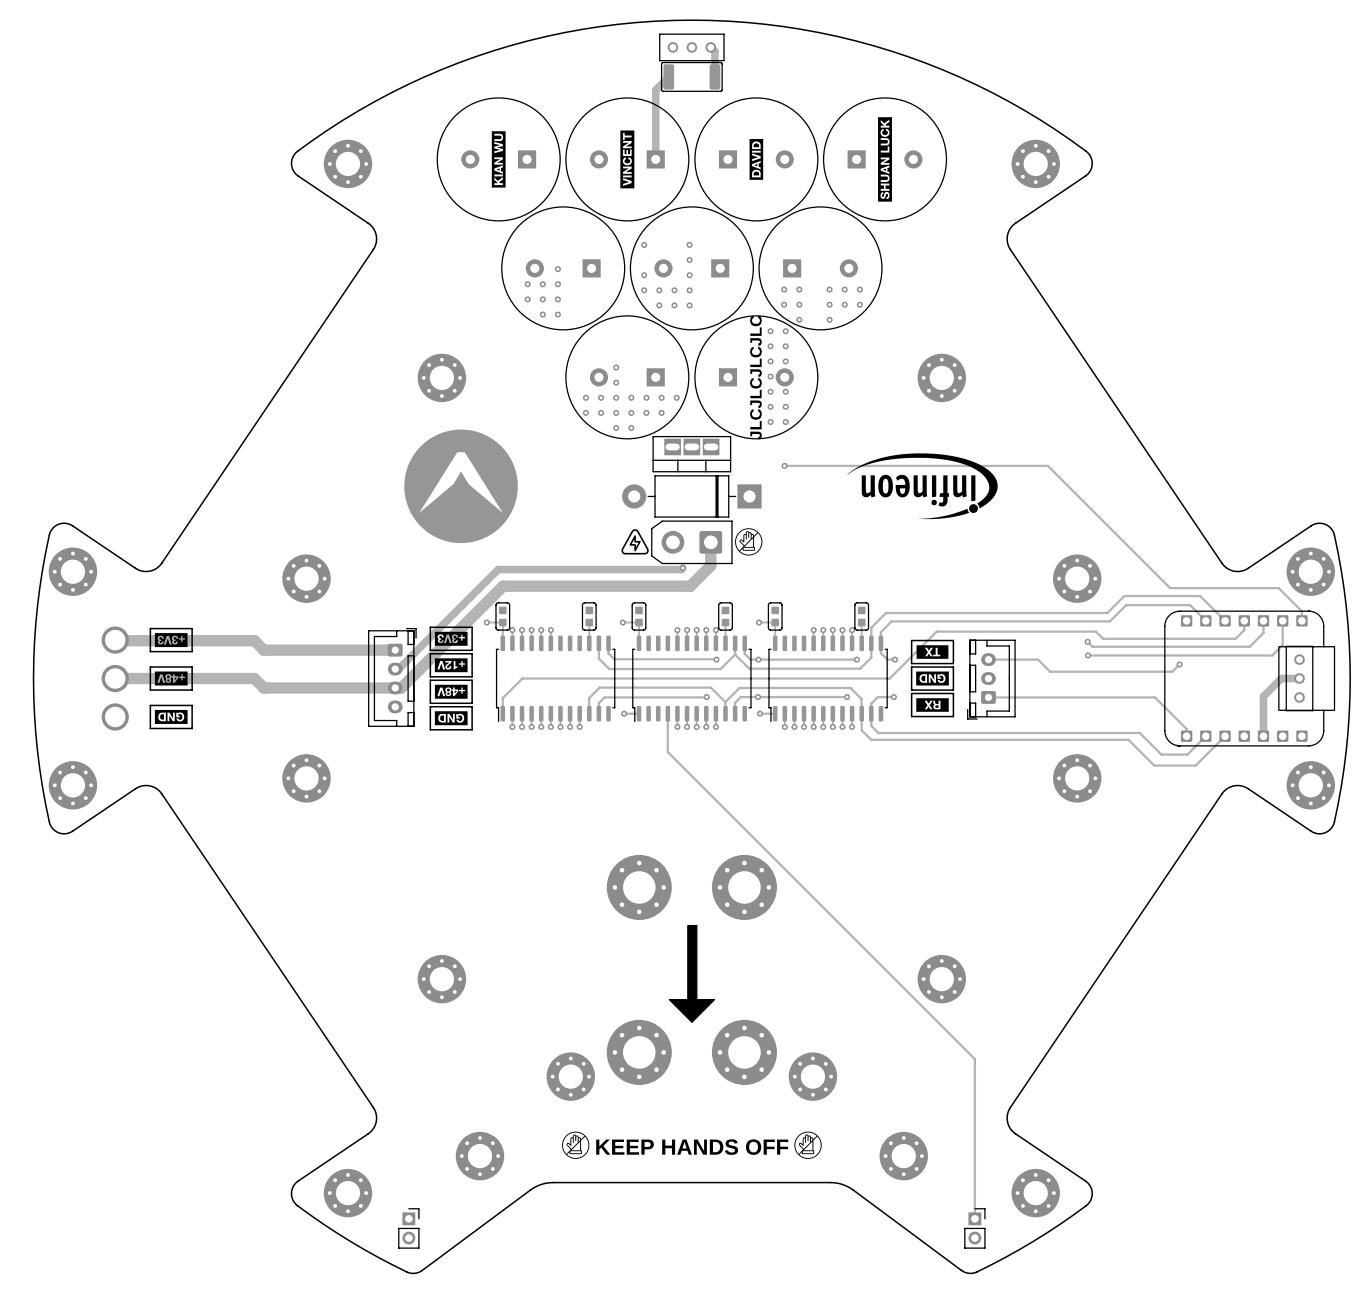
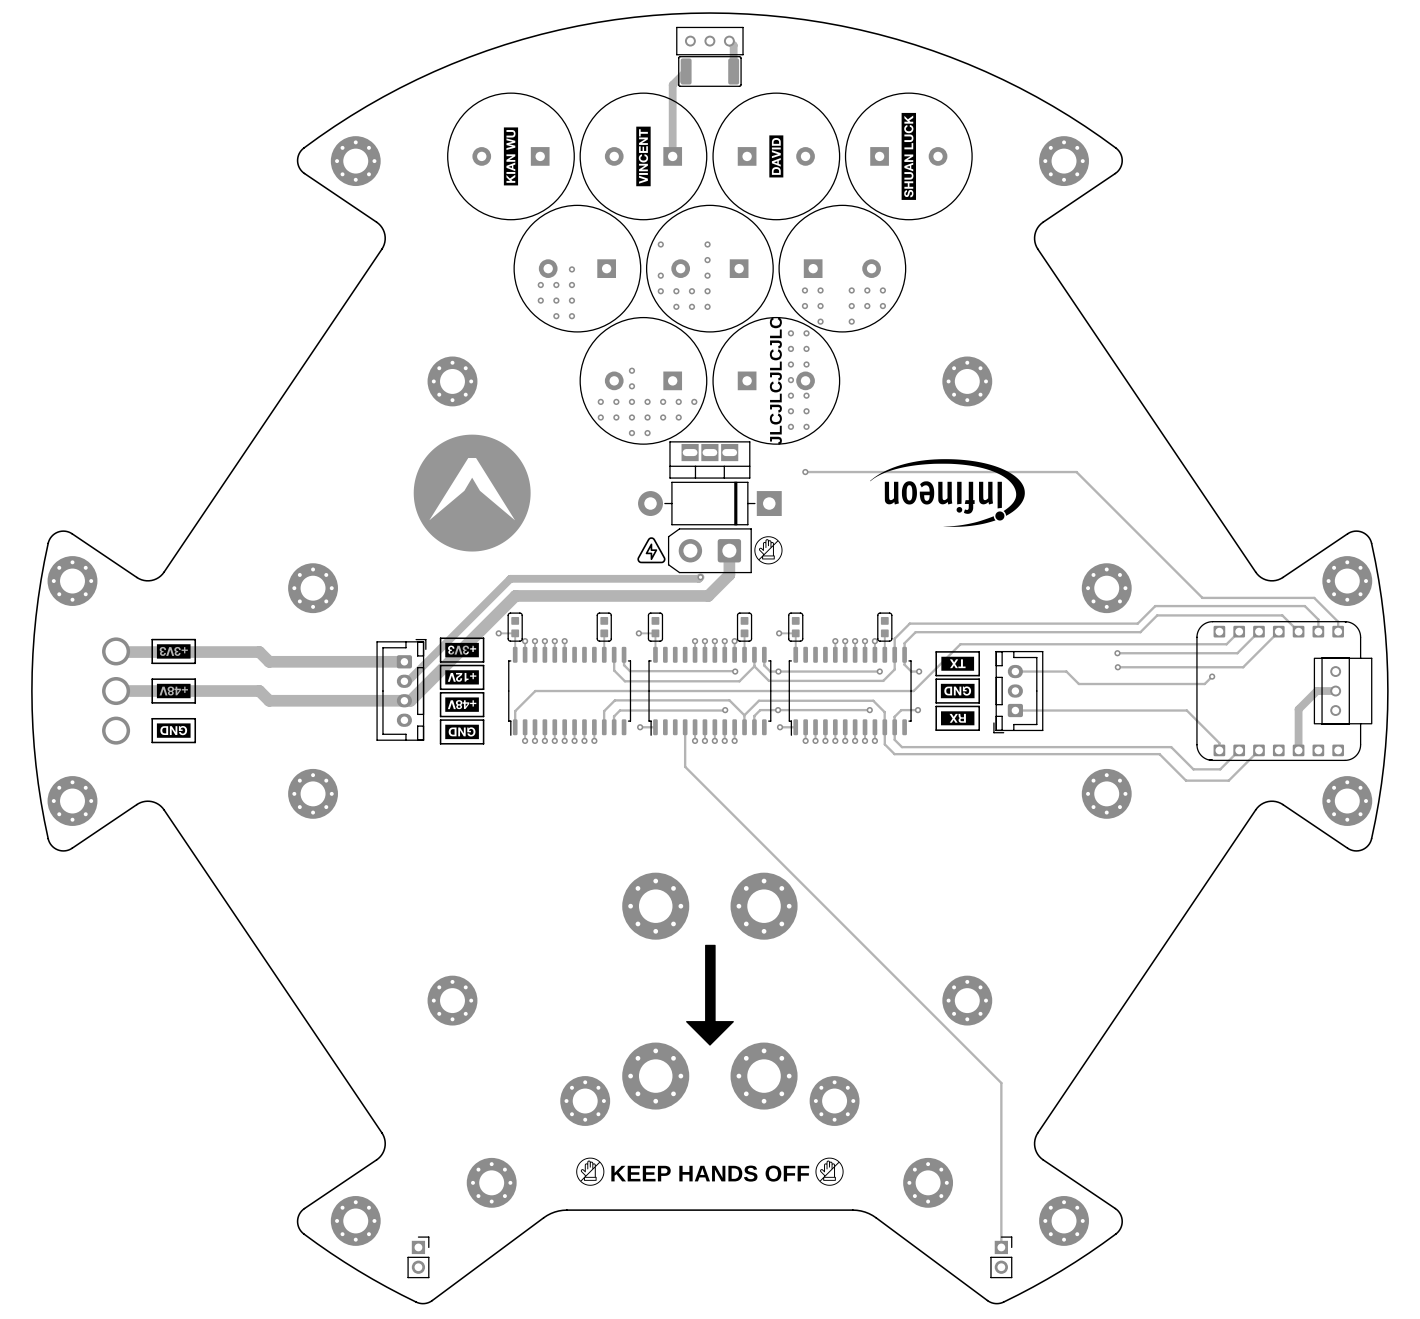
track: (1200, 596) (1225, 620) -> (1233, 606) (1304, 606) (1318, 619) (1318, 631)
track: (1190, 605) (1205, 620) -> (1222, 615) (1282, 615) (1298, 631)
track: (1244, 620) (1244, 630) (1235, 638) (1103, 638) (1095, 631) (935, 633) -> (1239, 631) (1226, 644) (960, 644)
track: (1263, 620) (1263, 632) (1249, 646) (1092, 646) (1087, 641) -> (1258, 631) (1237, 653) (1117, 653)
track: (1282, 620) (1282, 645) (1272, 655) (1209, 655) -> (1278, 631) (1243, 667)

